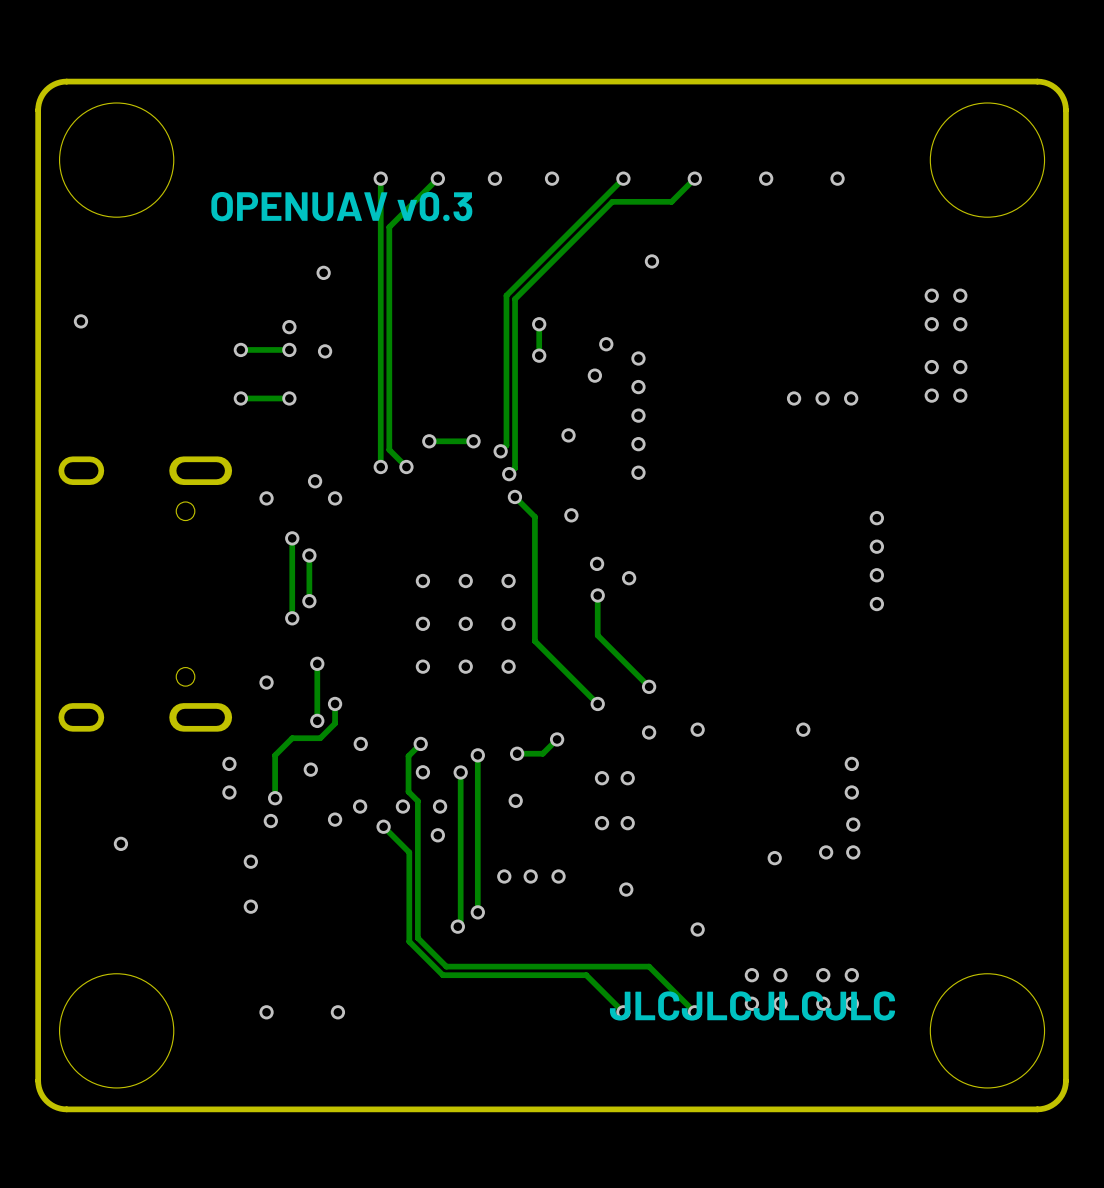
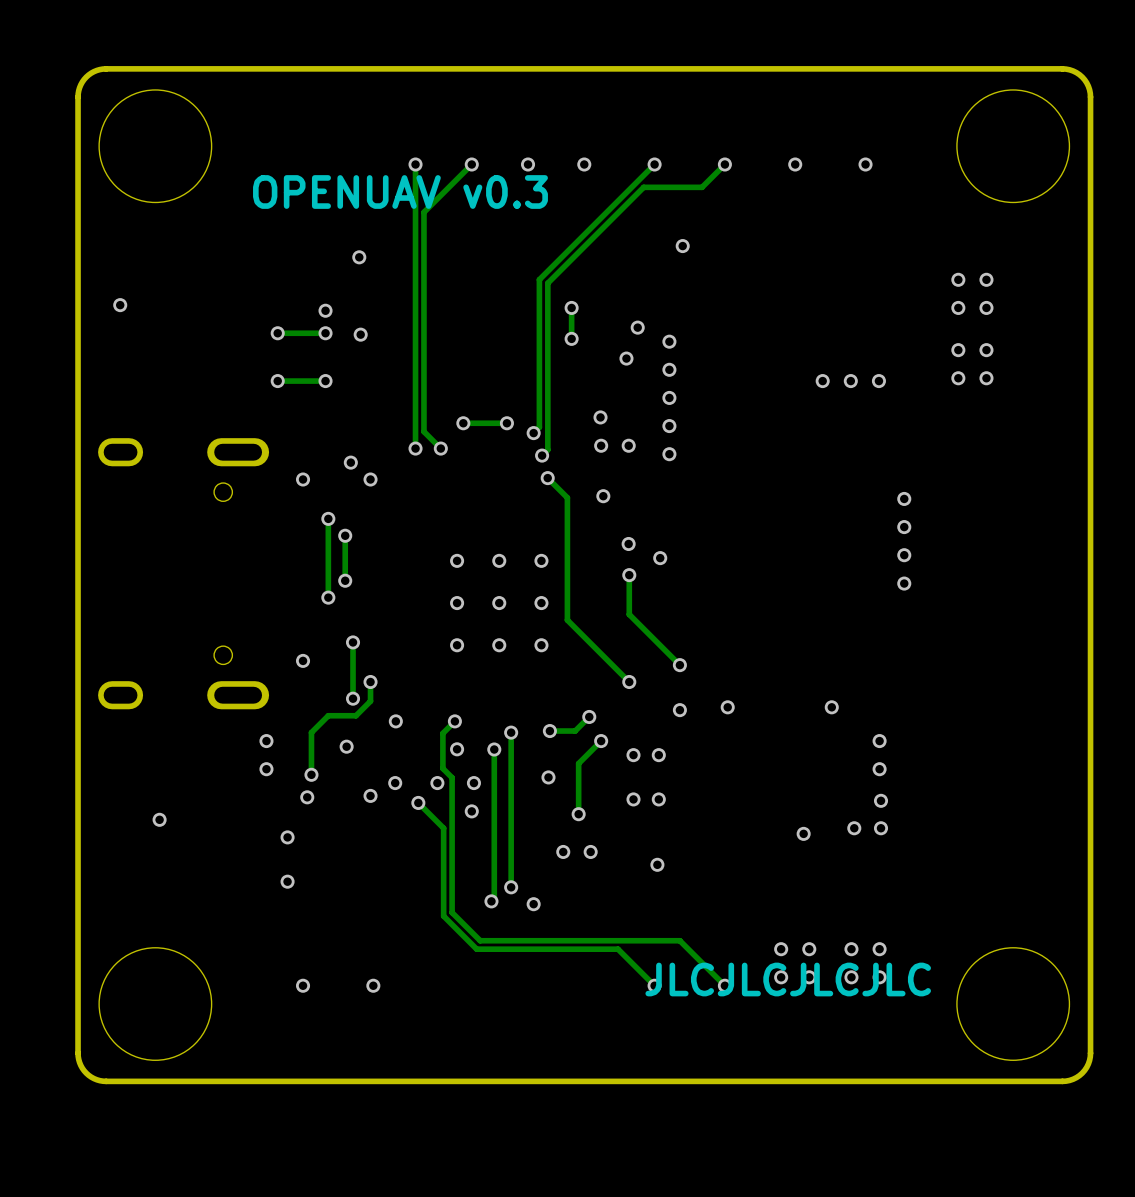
via: none -> (601, 445)
via: none -> (628, 445)
track: none -> (601, 741) (578, 763) (578, 814)
via: none -> (601, 741)
via: none -> (578, 814)
via: (504, 876) -> none
via: none -> (533, 904)
via: (697, 929) -> none

